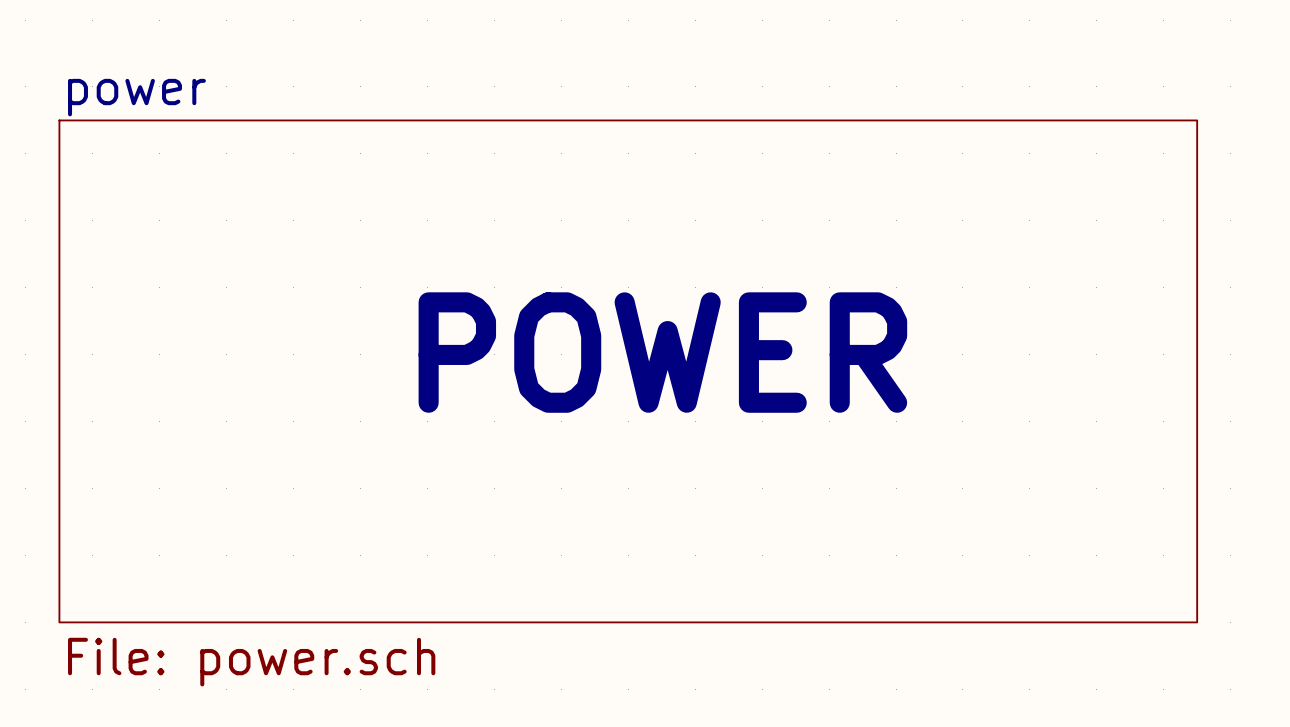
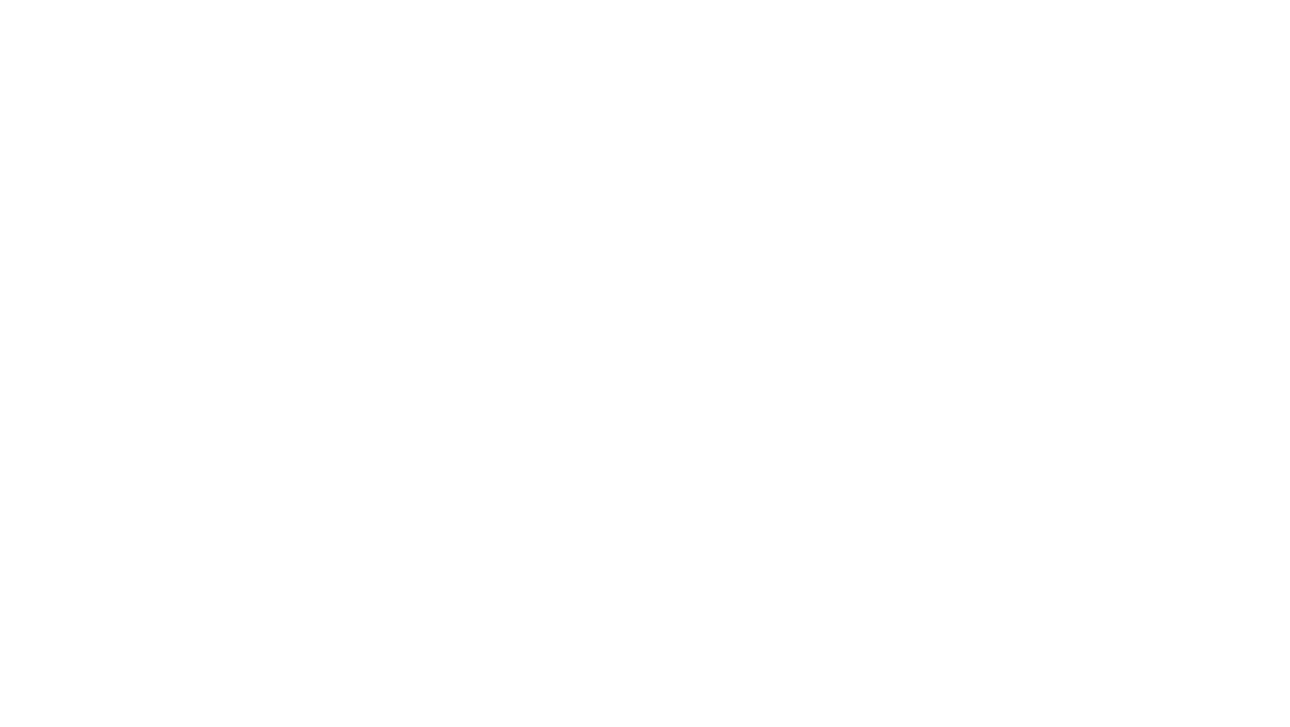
text: POWER (662, 352) -> none
sheet power: File: power.sch (628, 371) -> none

